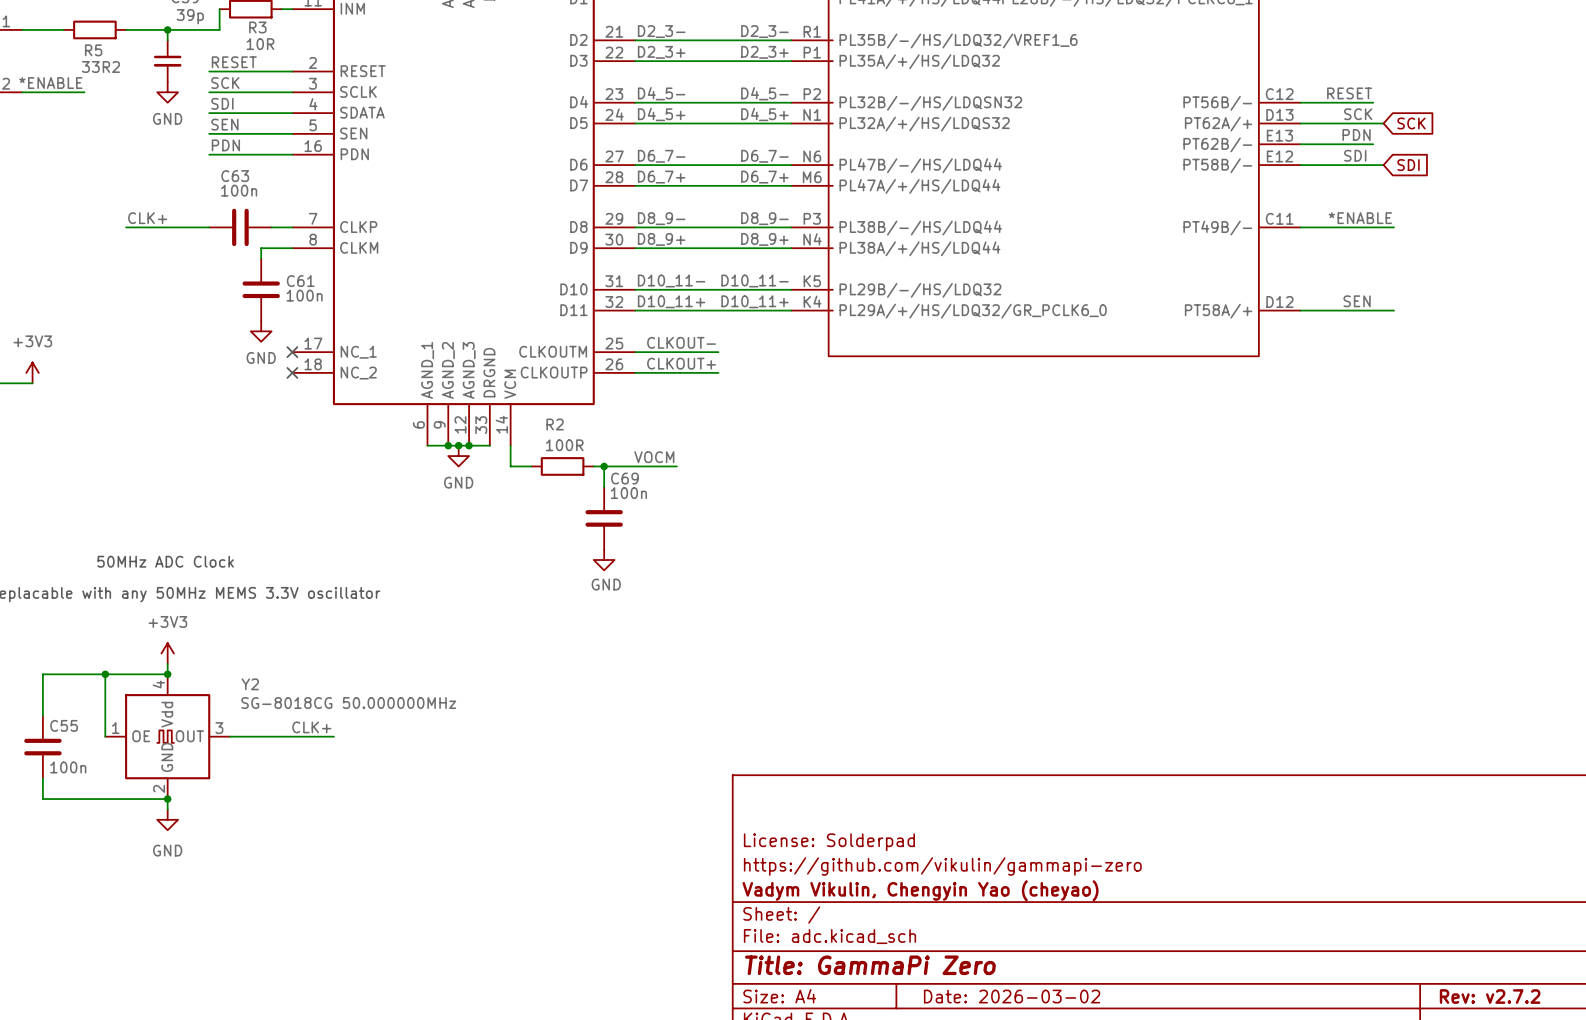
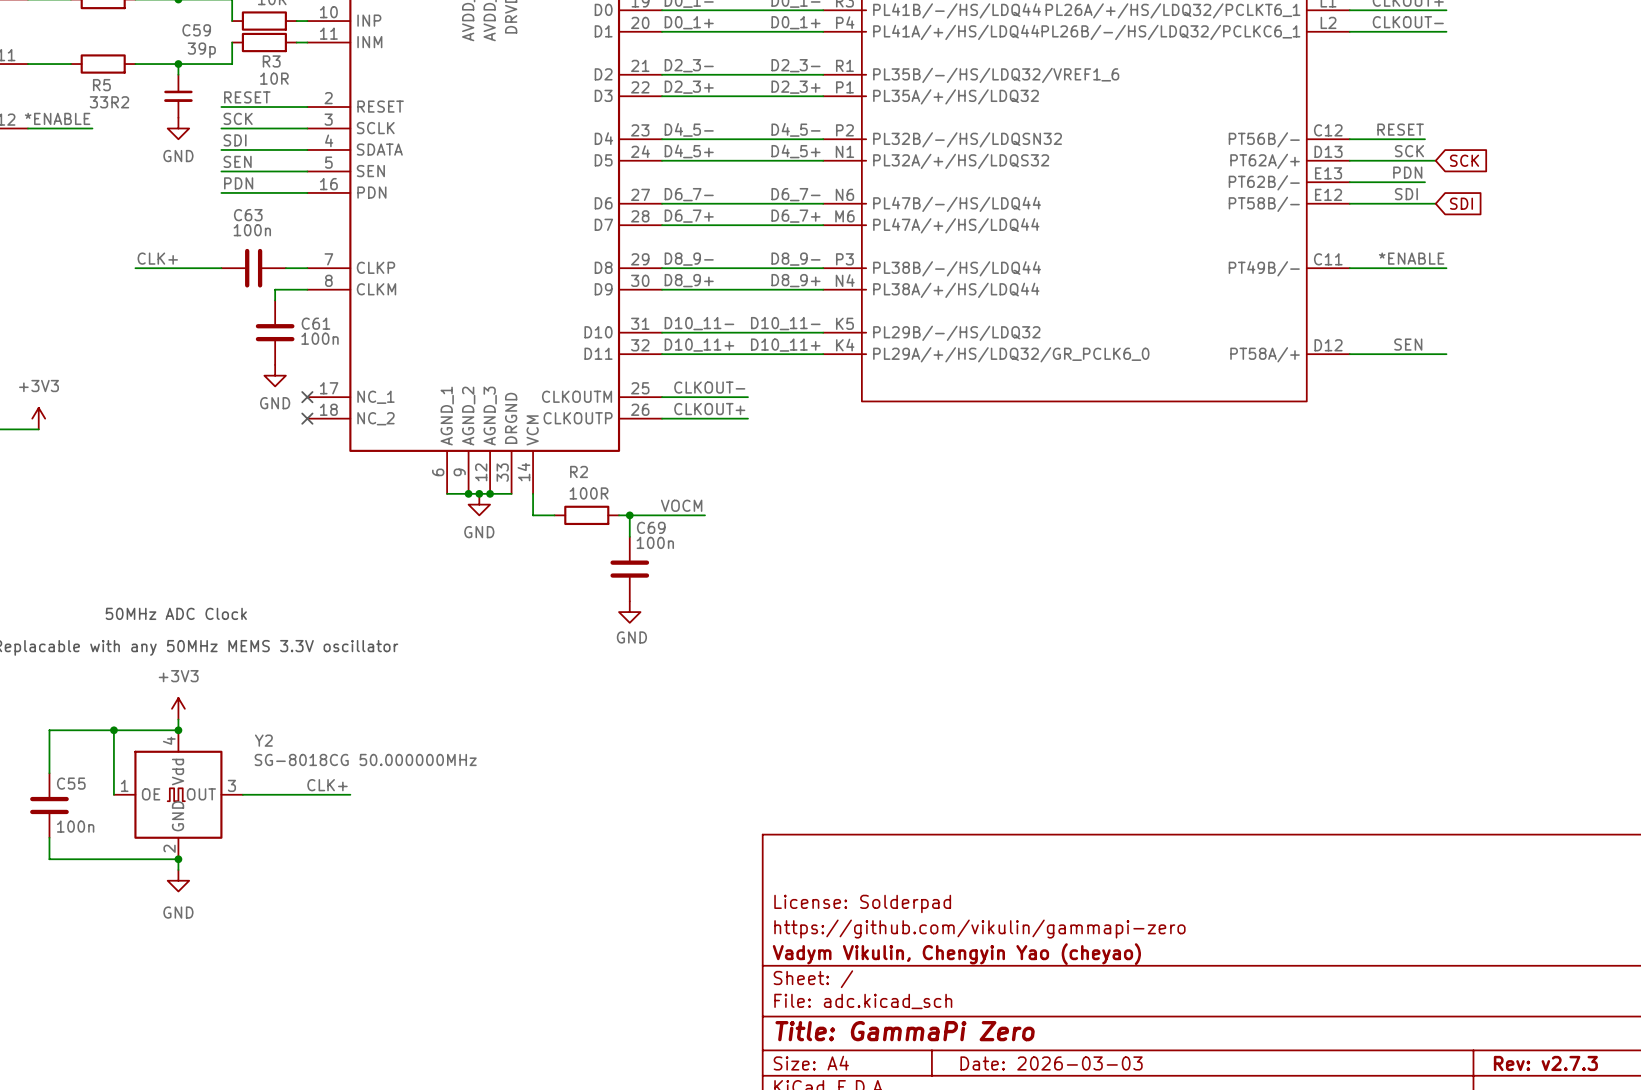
title block: Date: 2026-03-02 (1012, 996) -> Date: 2026-03-03 (1051, 1063)
title block: Rev: v2.7.2 (1490, 996) -> Rev: v2.7.3 (1545, 1063)

